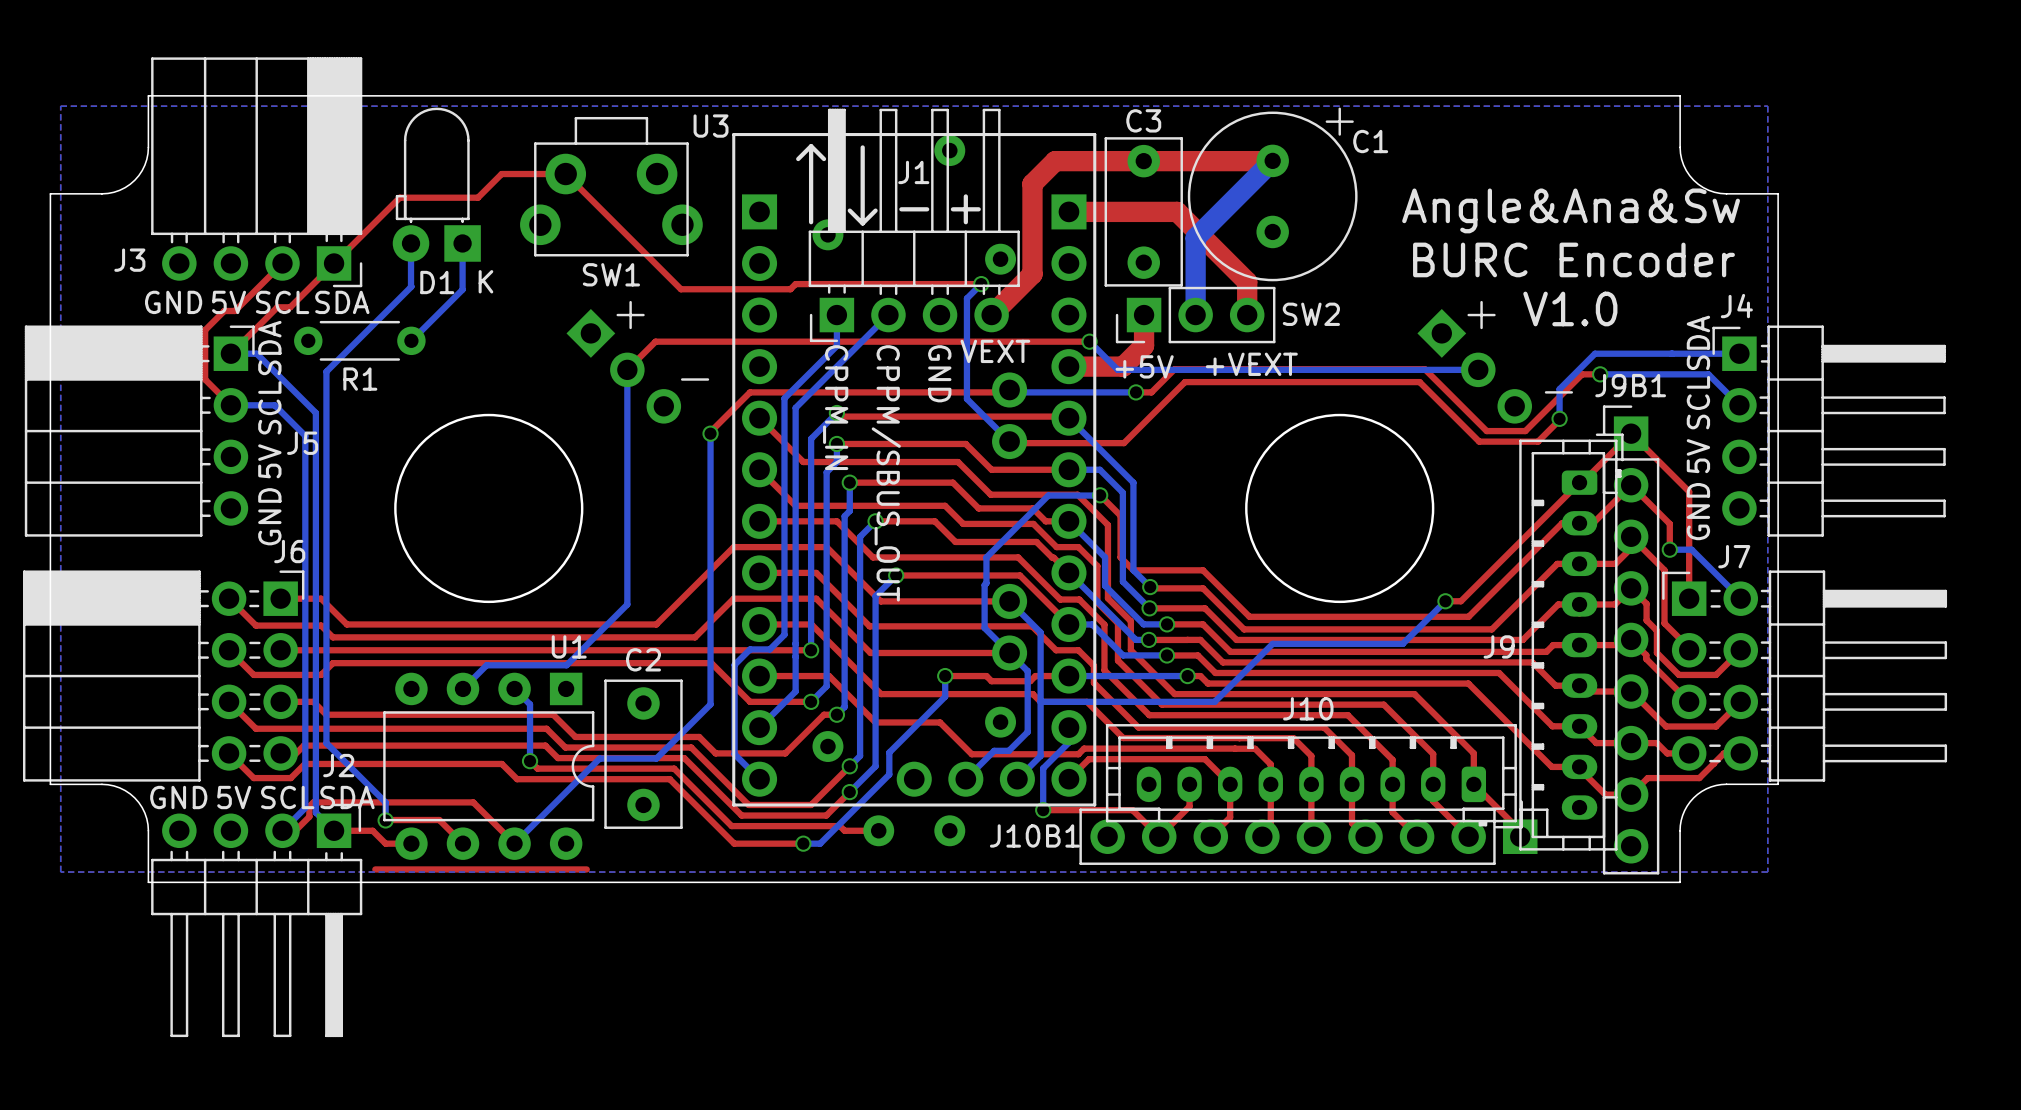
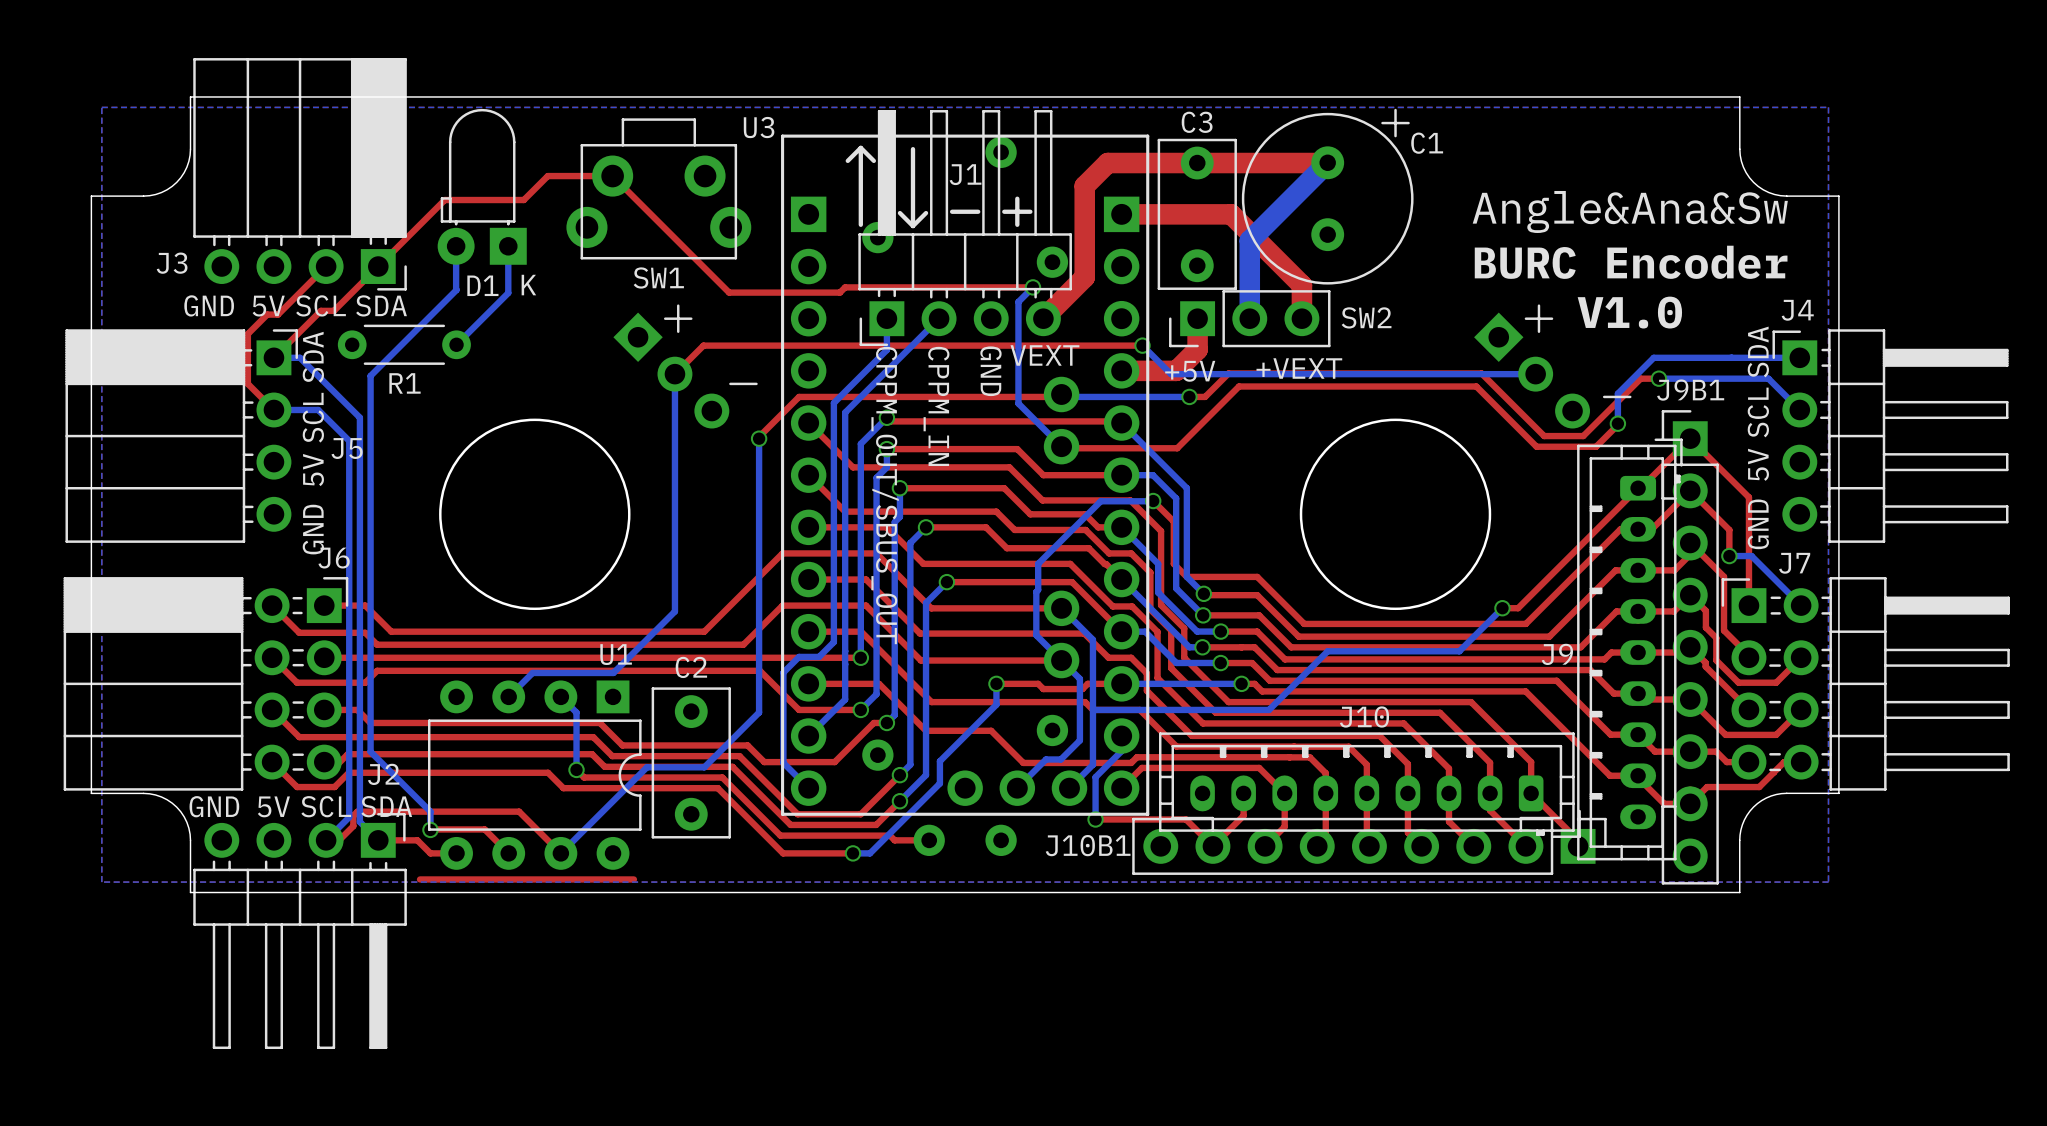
text: CPPM_IN (835, 407) -> CPPM_OUT/SBUS_OUT (885, 495)
text: CPPM/SBUS_OUT (886, 473) -> CPPM_IN (936, 406)

